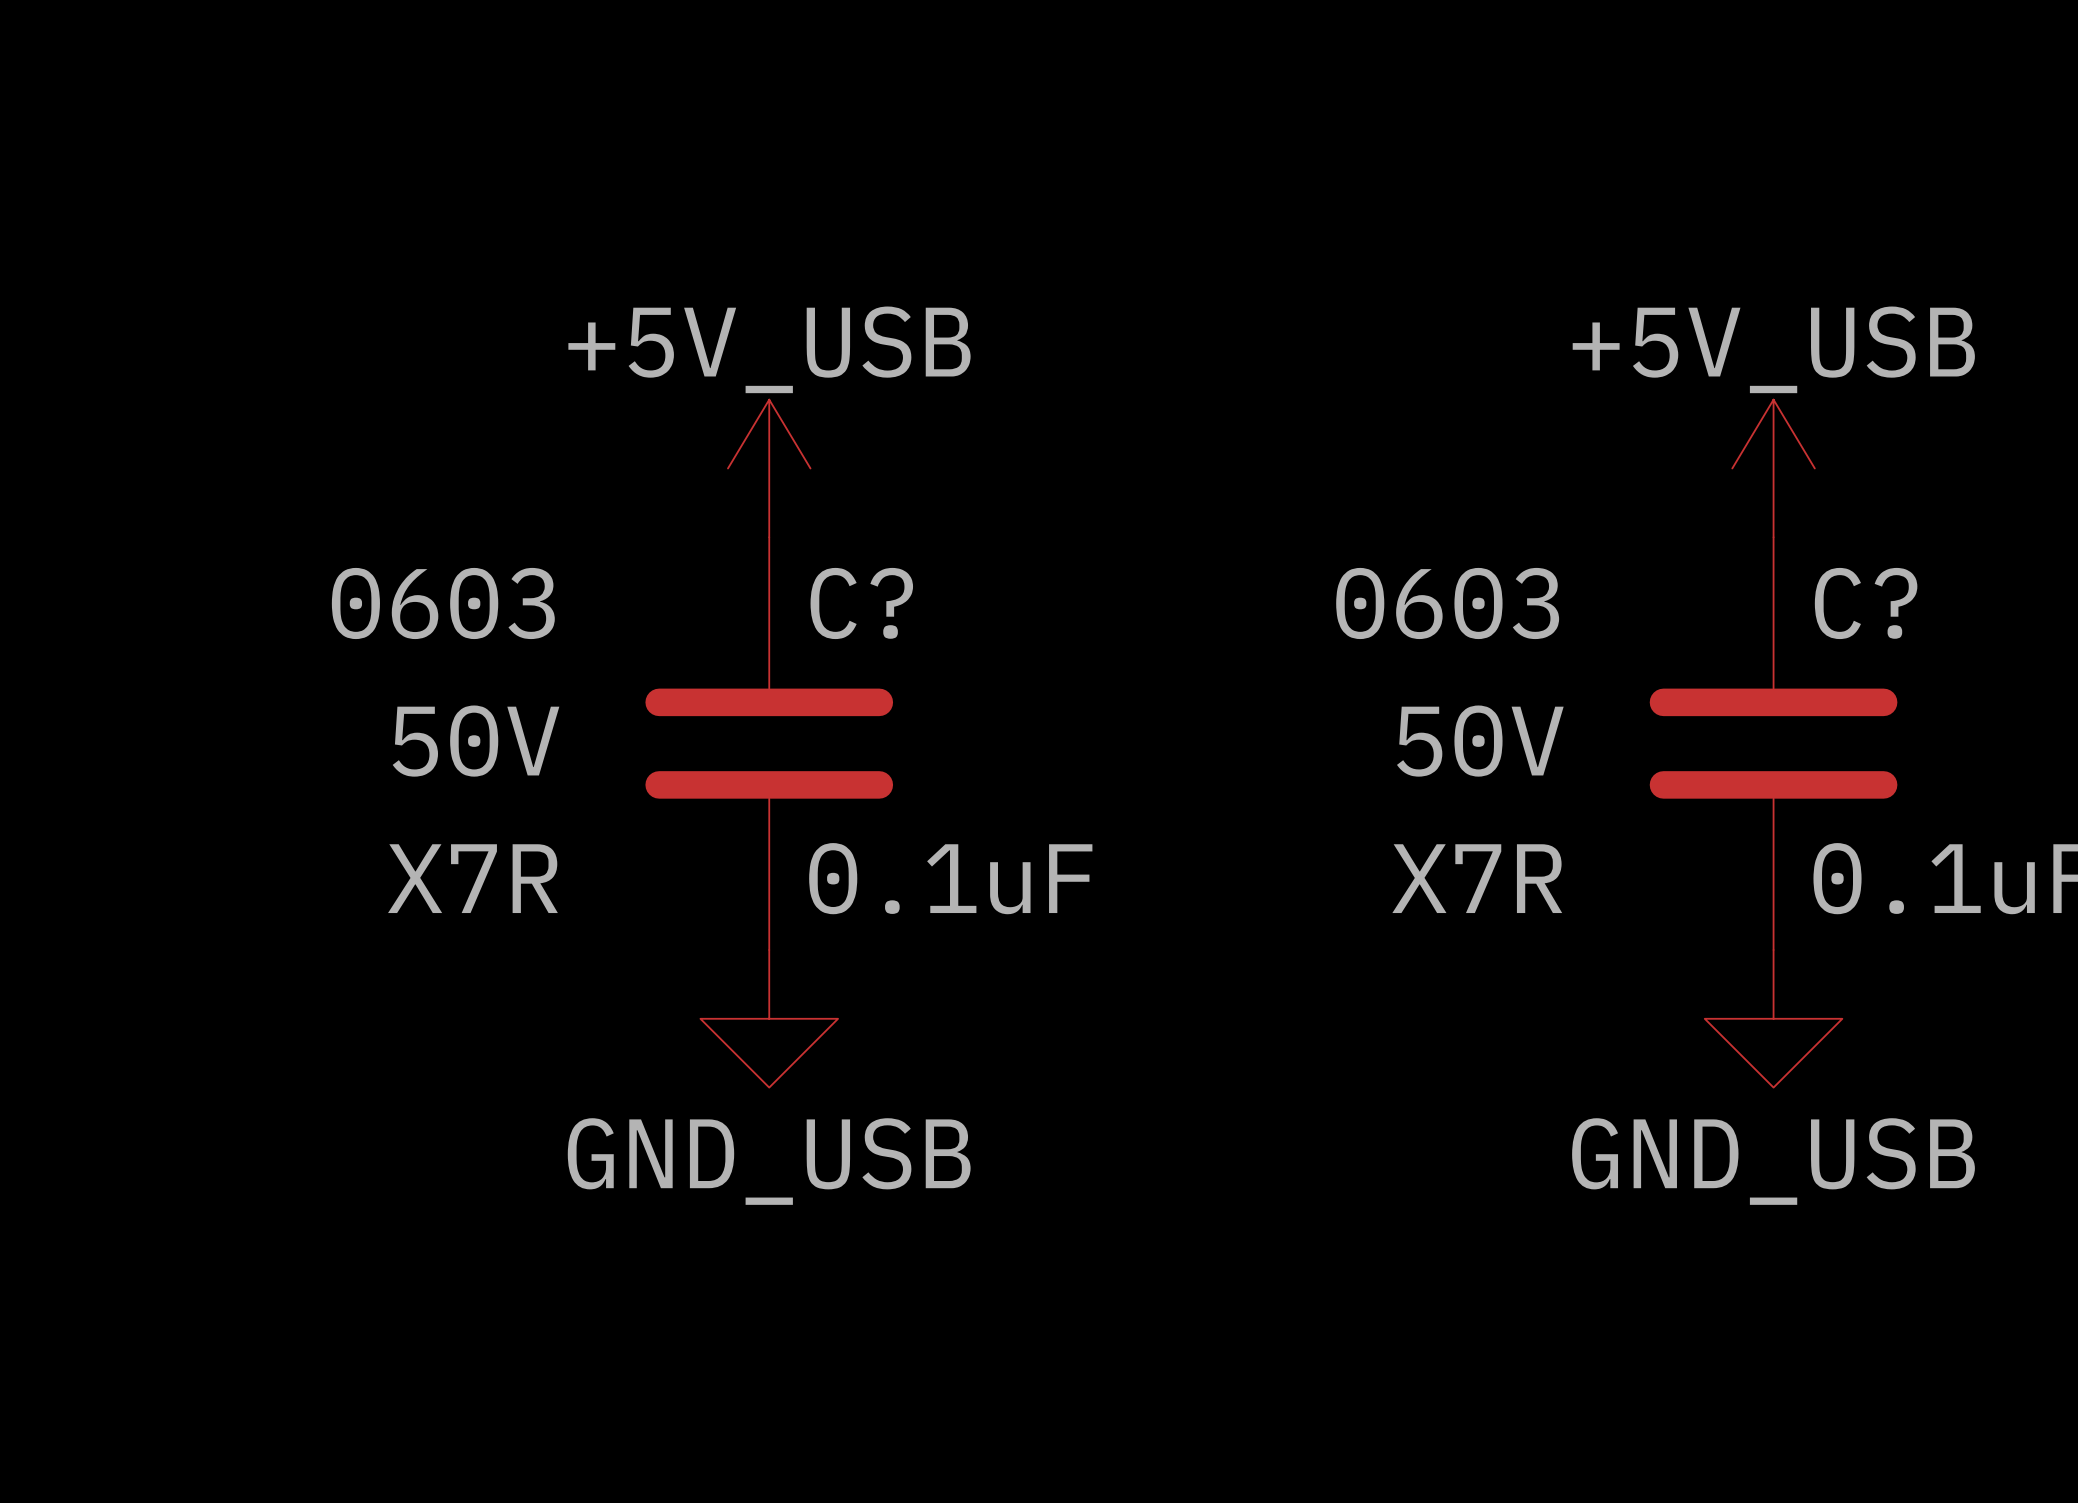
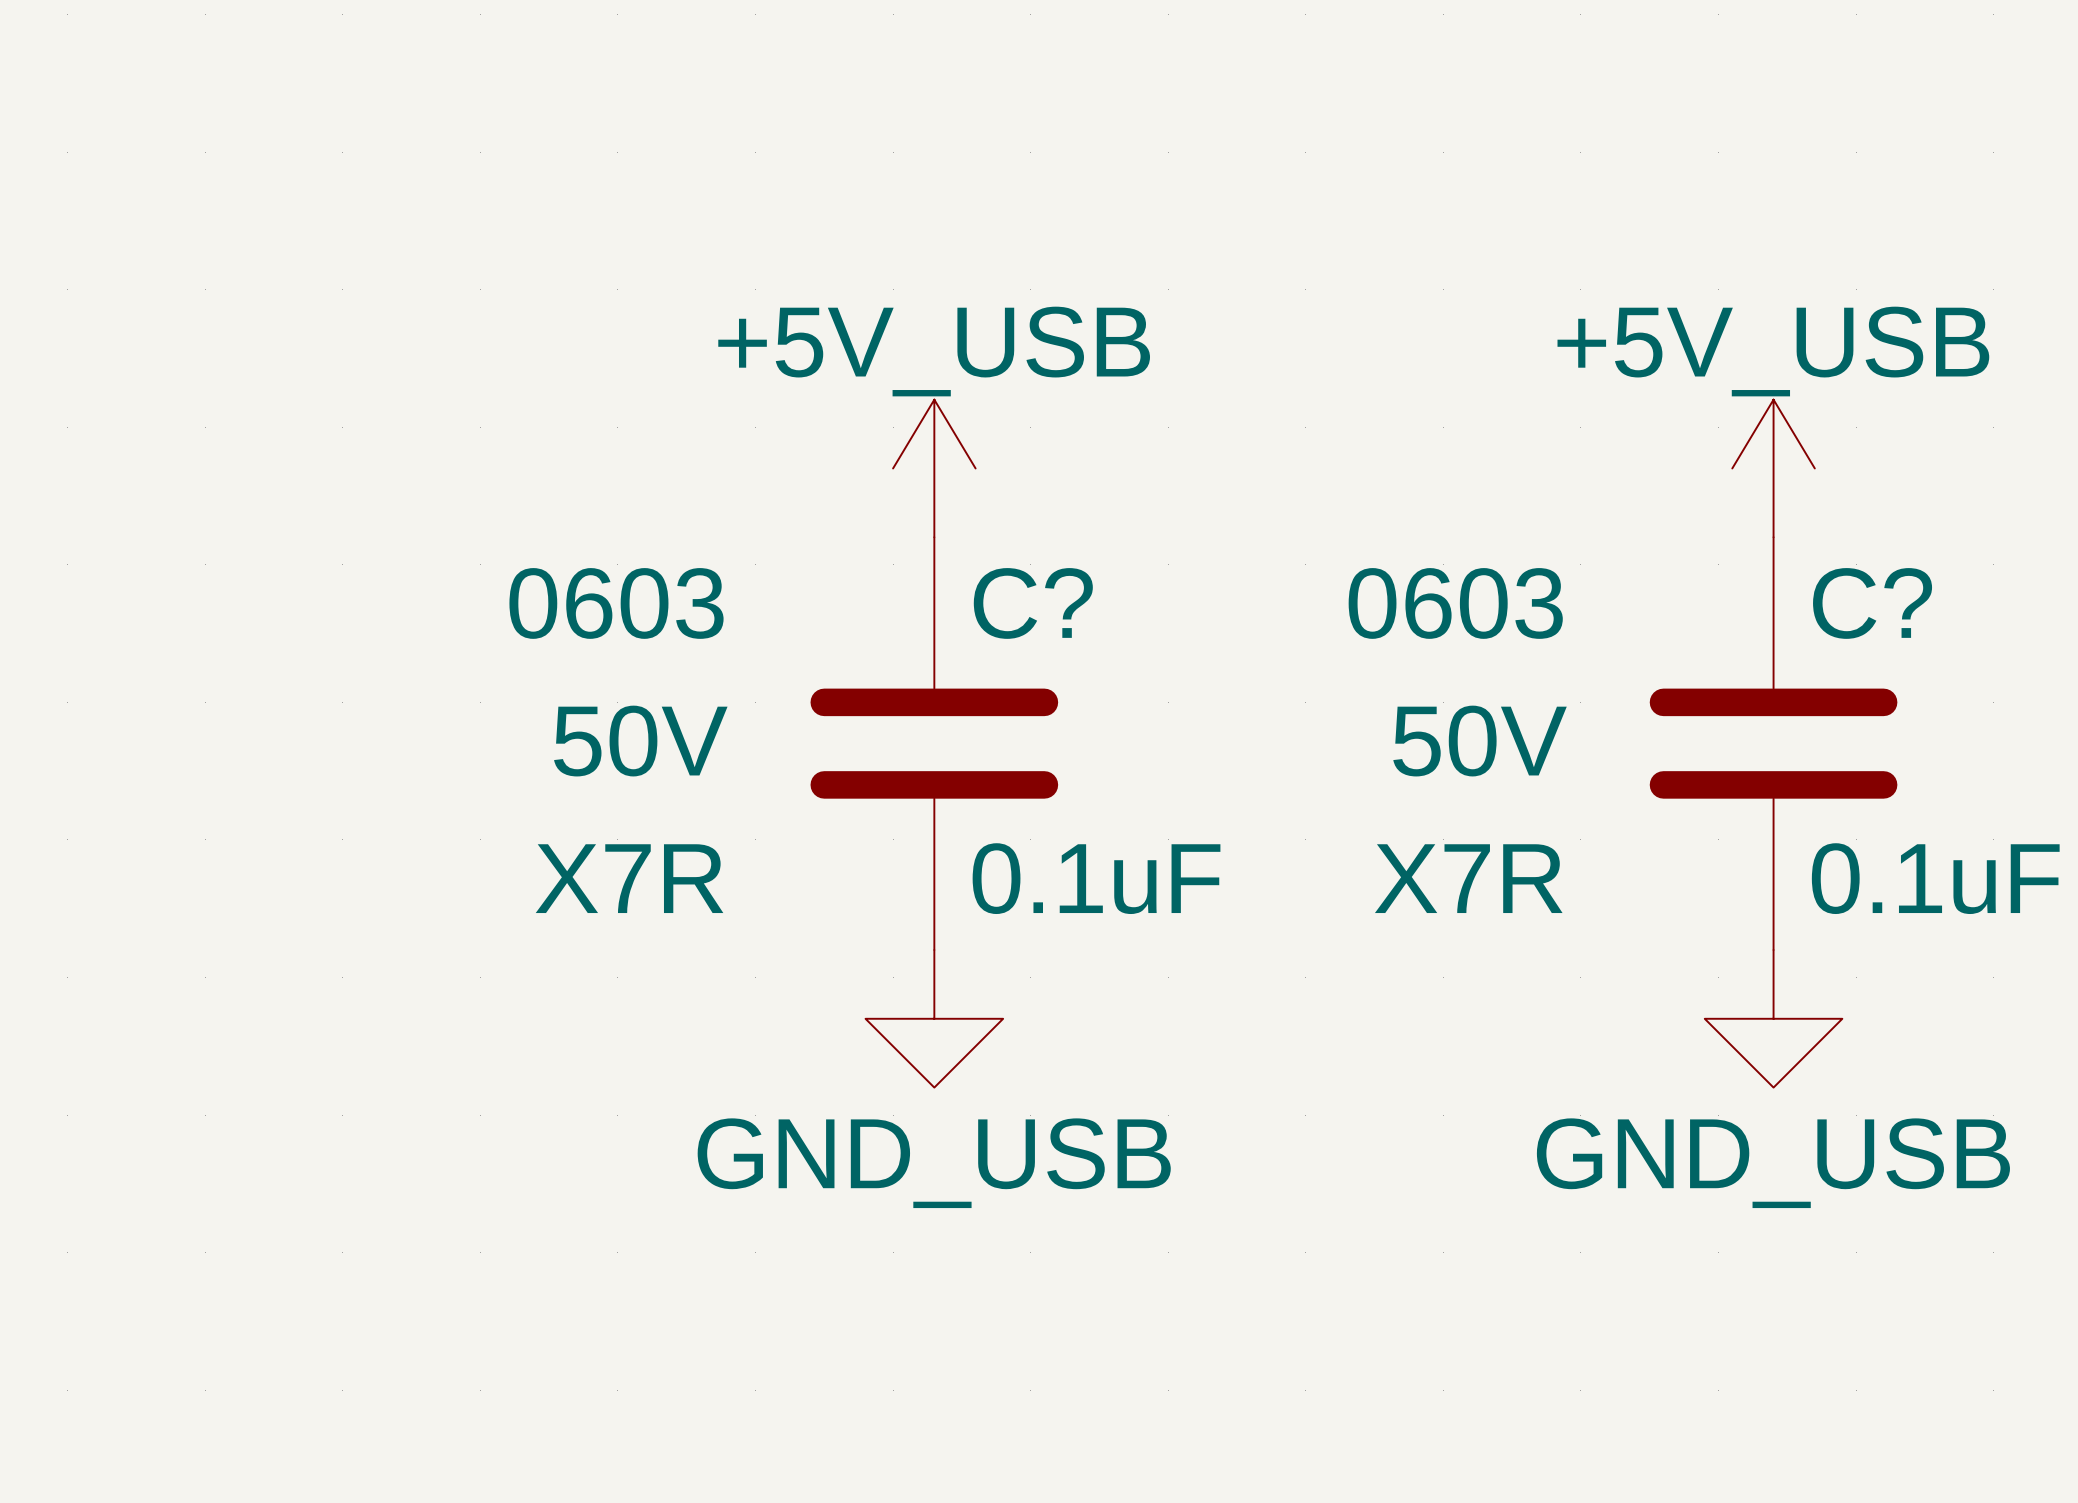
power symbol position: +5V_USB (769, 468) -> +5V_USB (934, 468)
C? position: (769, 743) -> (934, 743)
power symbol position: GND_USB (769, 1018) -> GND_USB (934, 1018)

